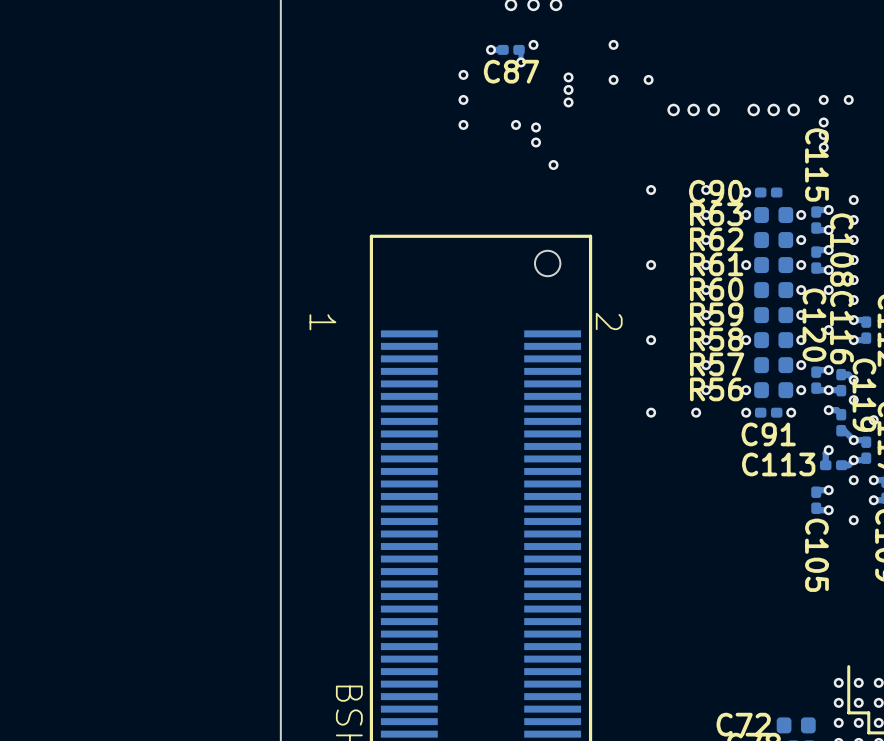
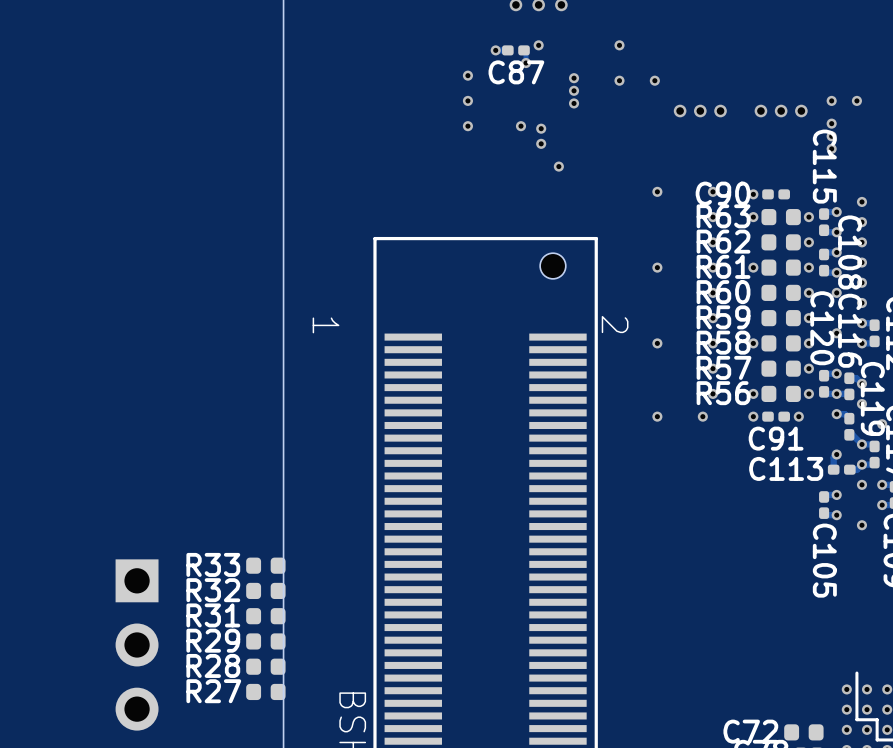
R33: none -> (265, 565)
R32: none -> (265, 590)
R31: none -> (265, 616)
R29: none -> (265, 641)
part: none -> (137, 644)
R28: none -> (265, 666)
R27: none -> (265, 691)

